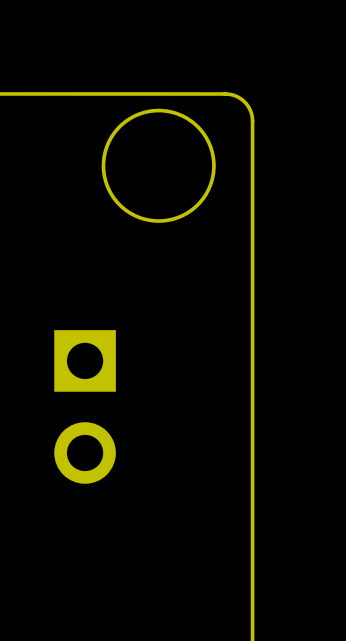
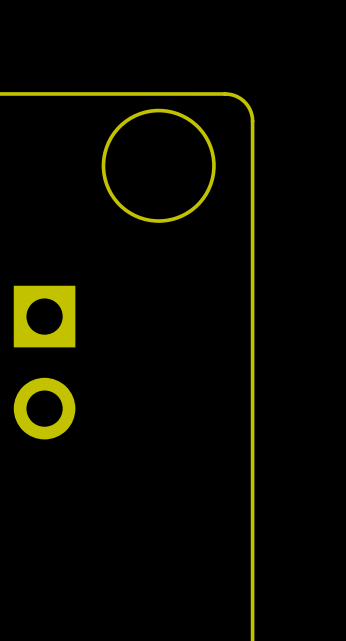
part position: (85, 406) -> (44, 362)

